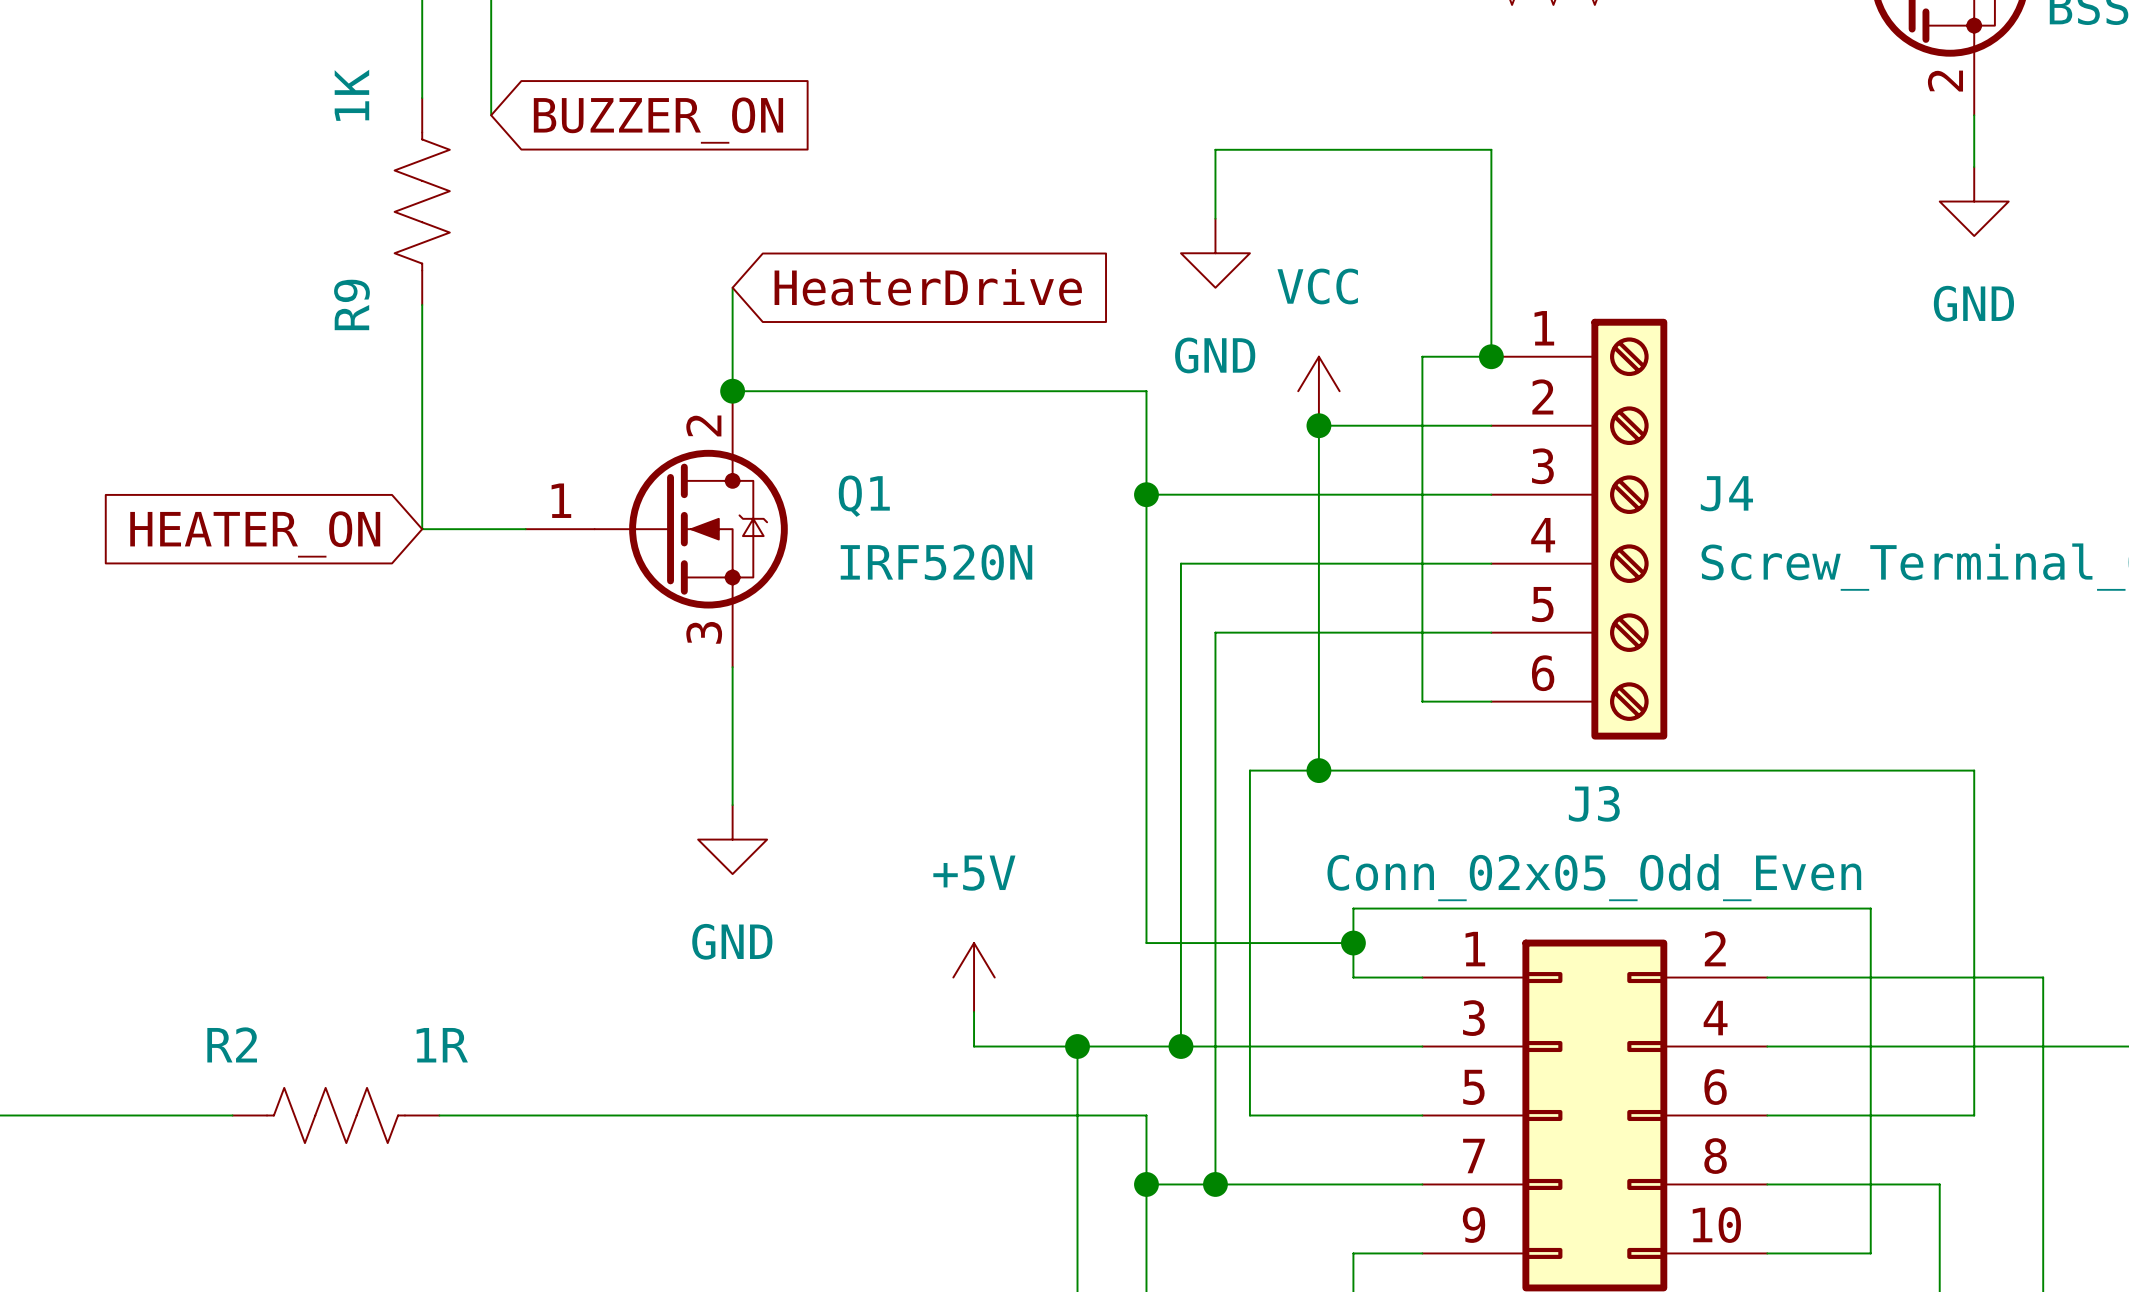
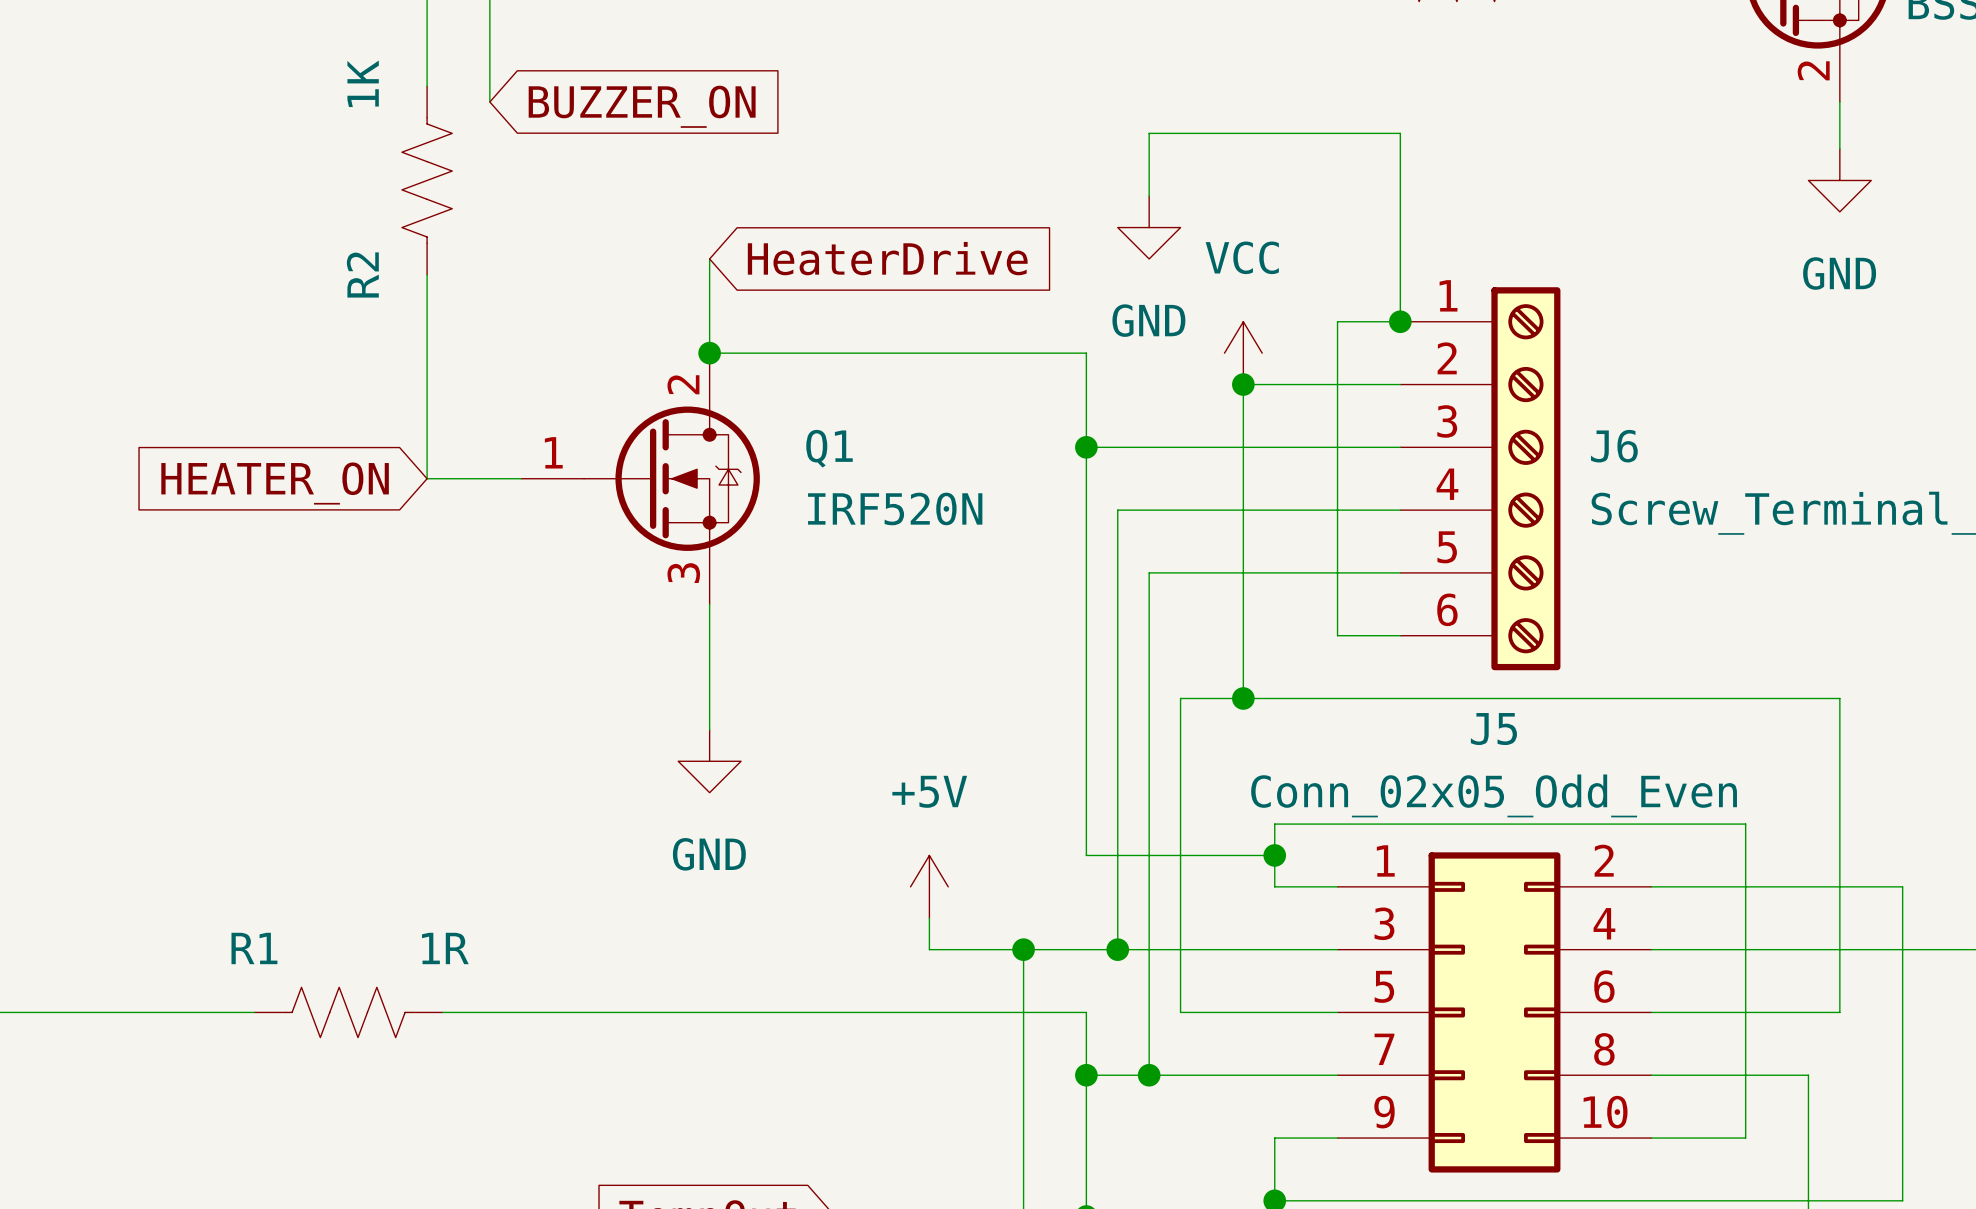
R9 name: R9 (351, 304) -> R2 (362, 274)
J4 name: J4 (1726, 493) -> J6 (1614, 446)
J3 name: J3 (1594, 803) -> J5 (1493, 729)
R2 name: R2 (232, 1044) -> R1 (254, 948)

